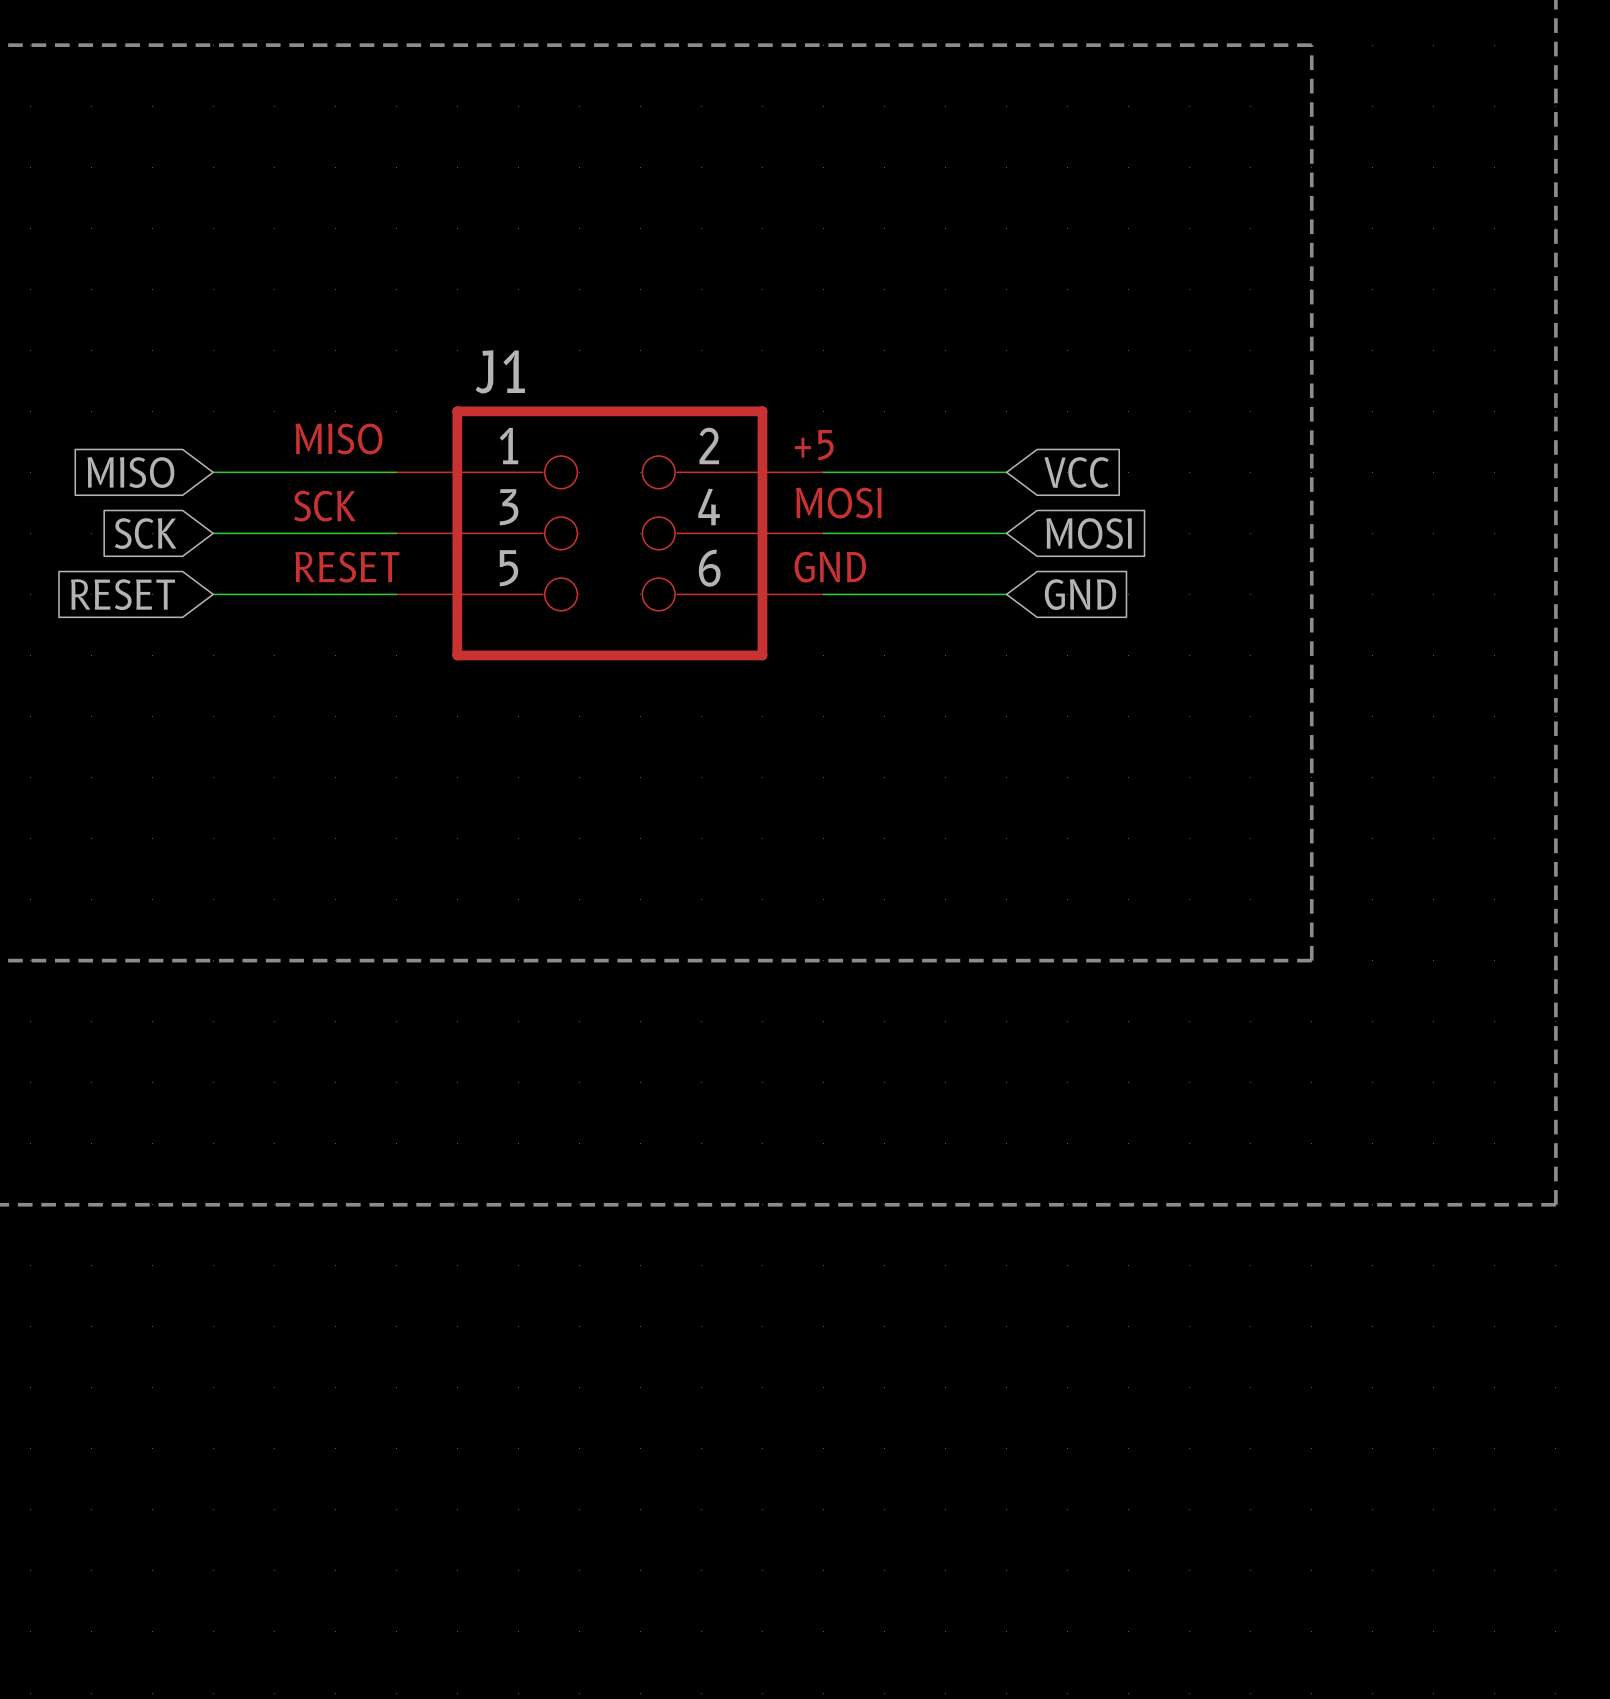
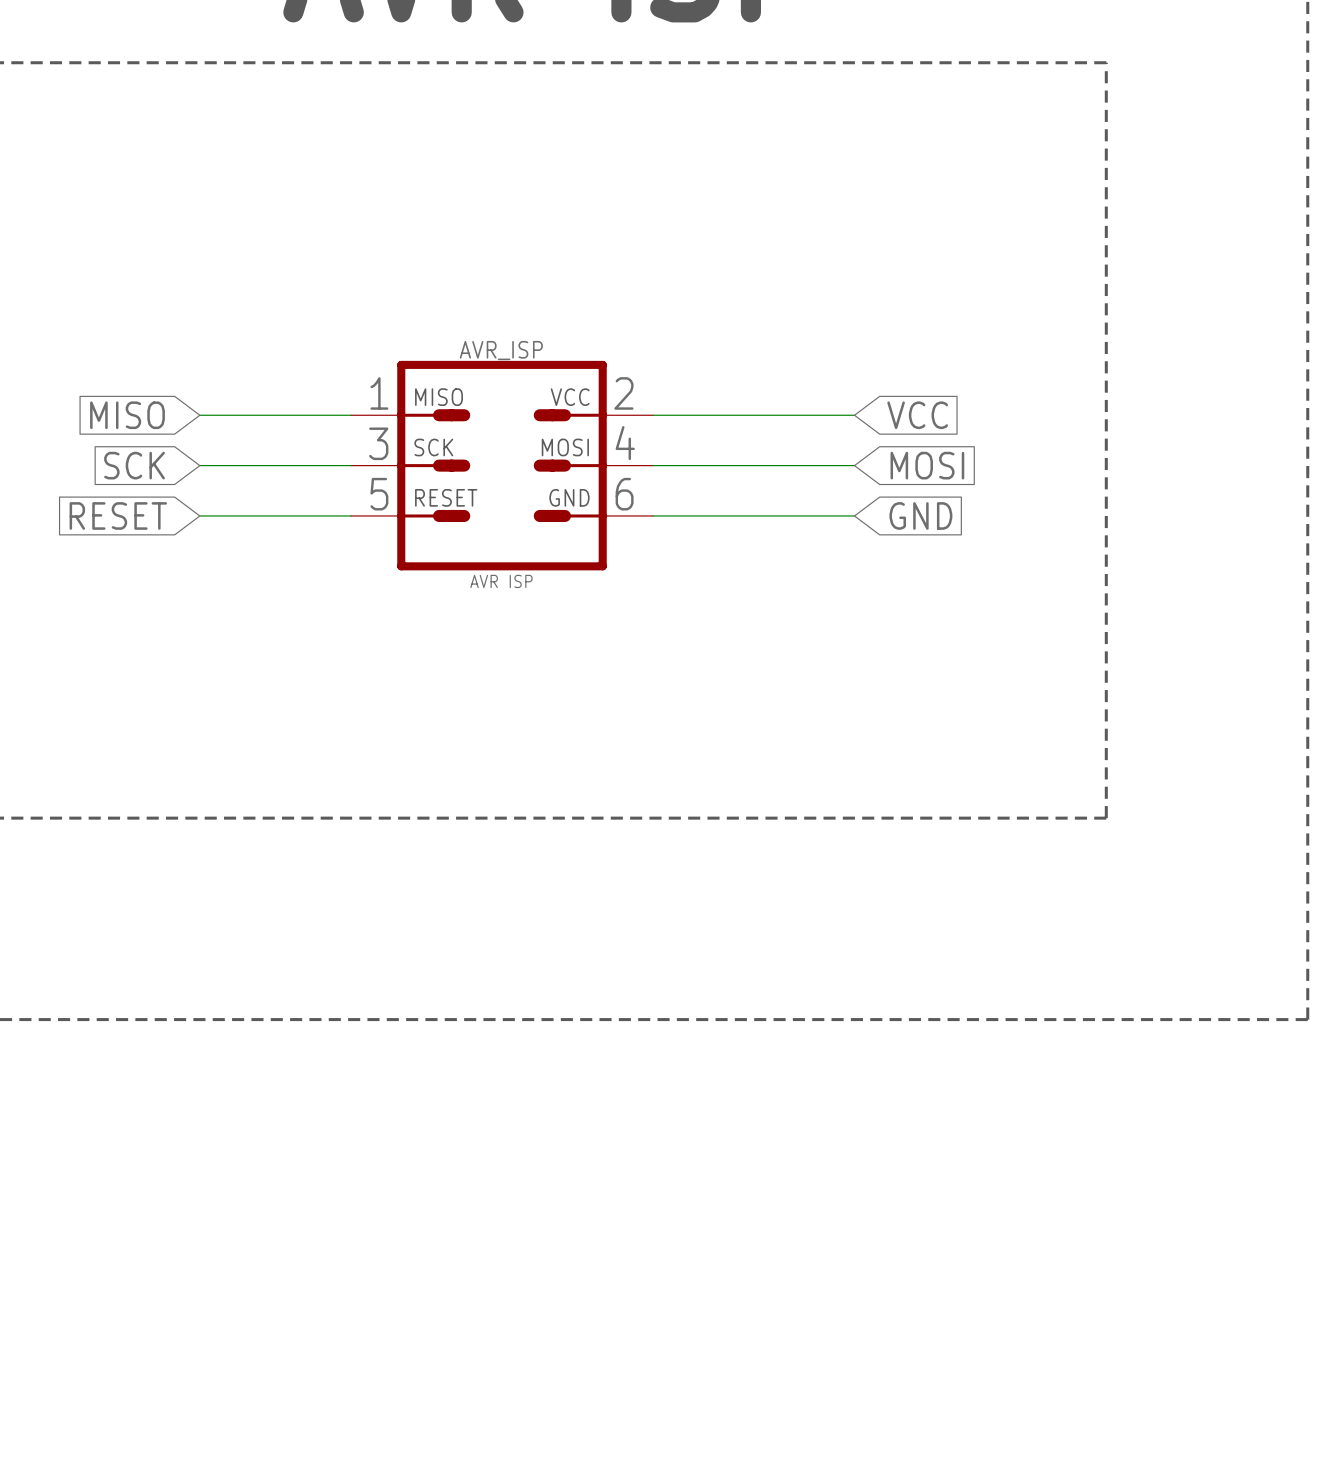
AVR_ISP: none -> AVR ISP (501, 465)
J1: (609, 533) -> none

